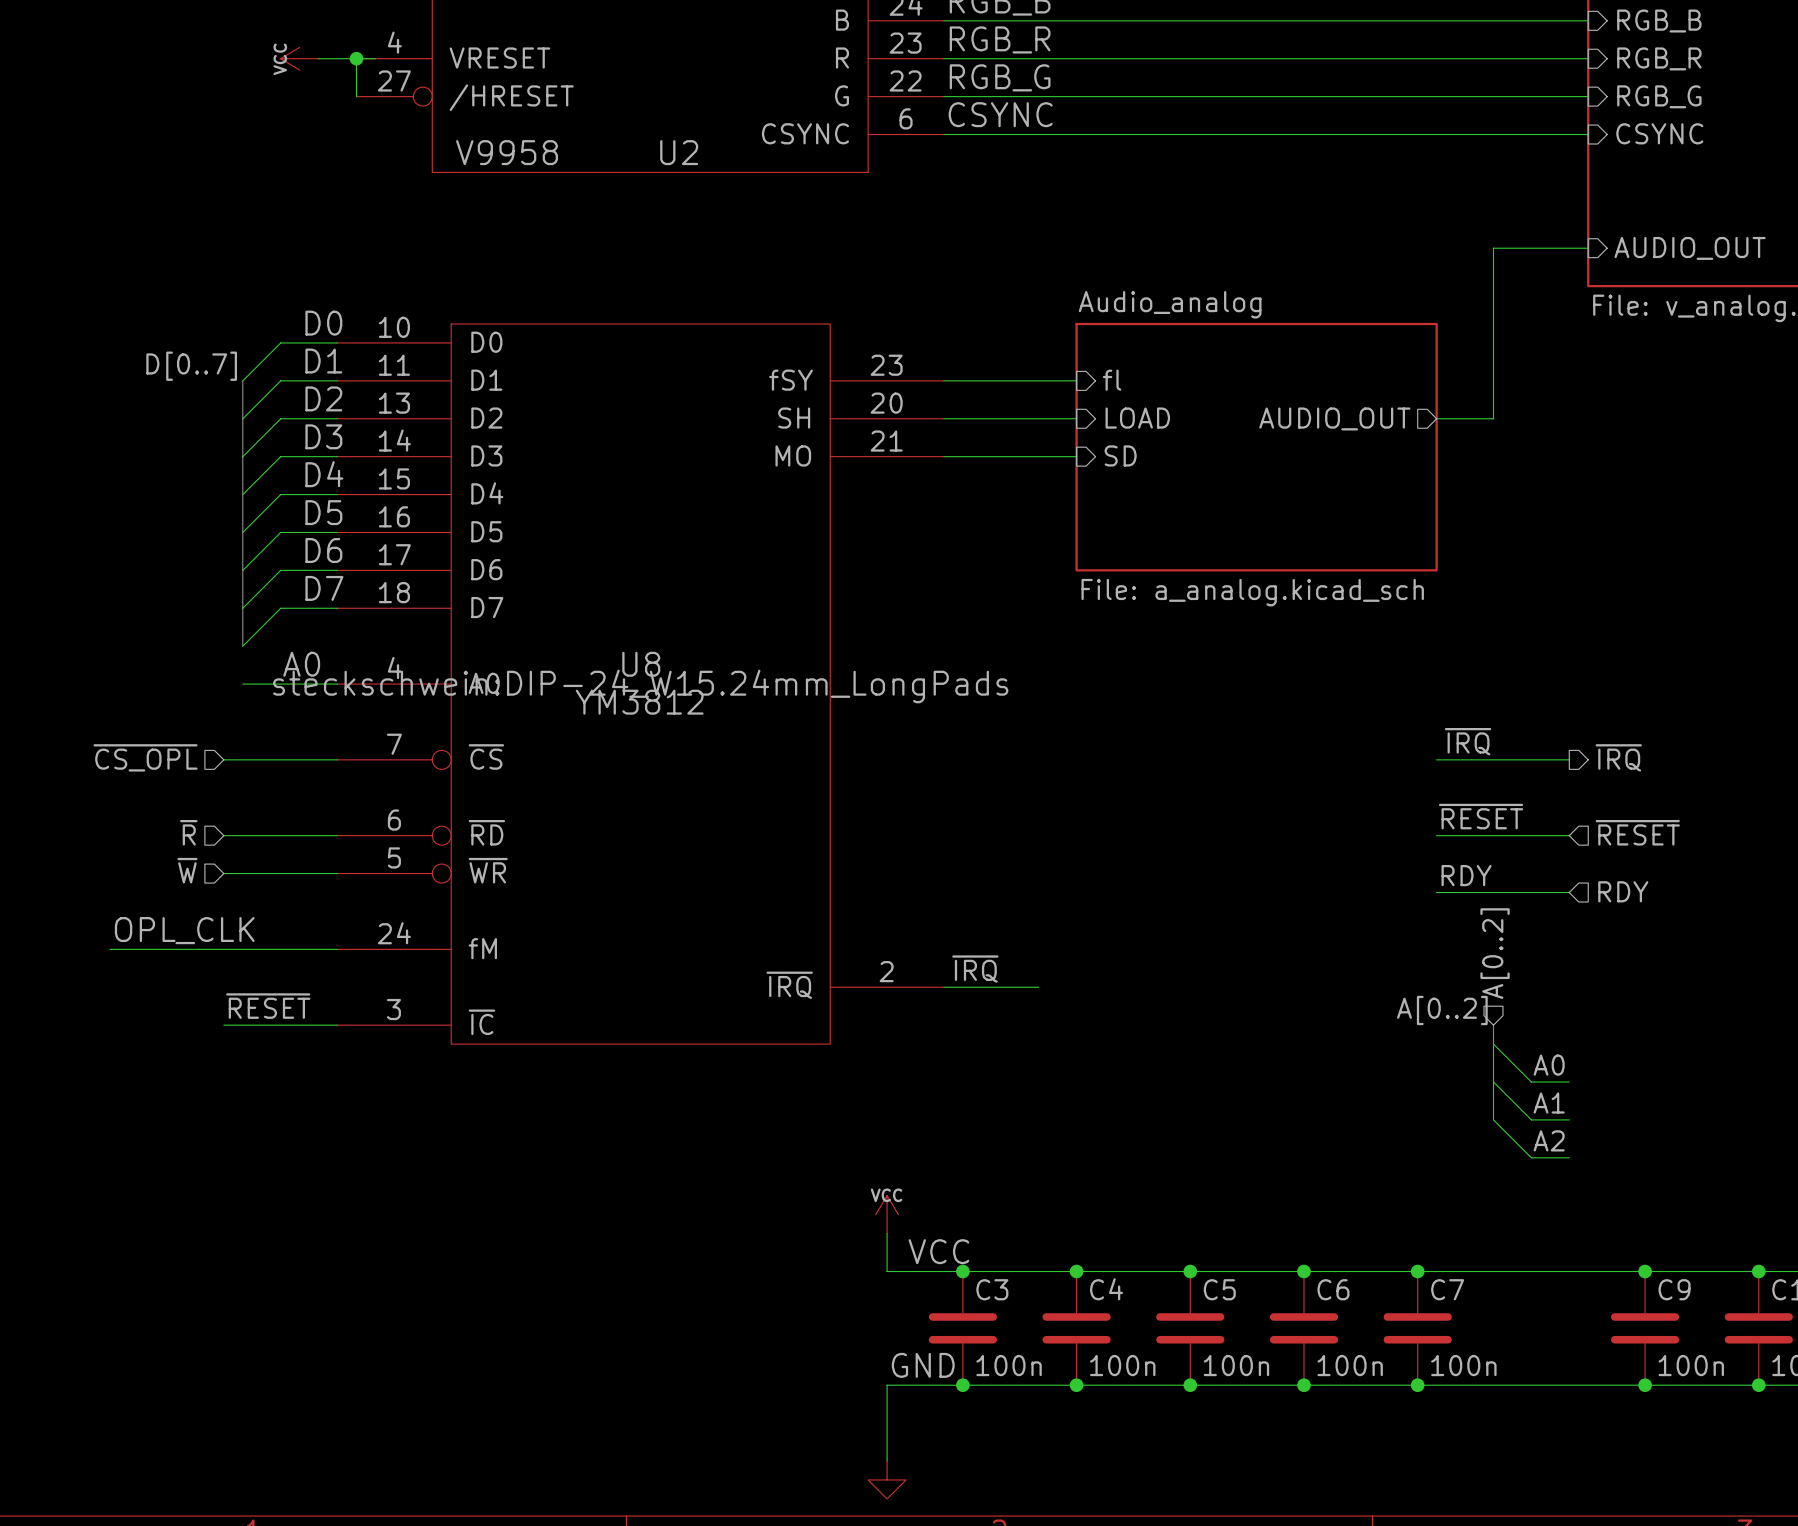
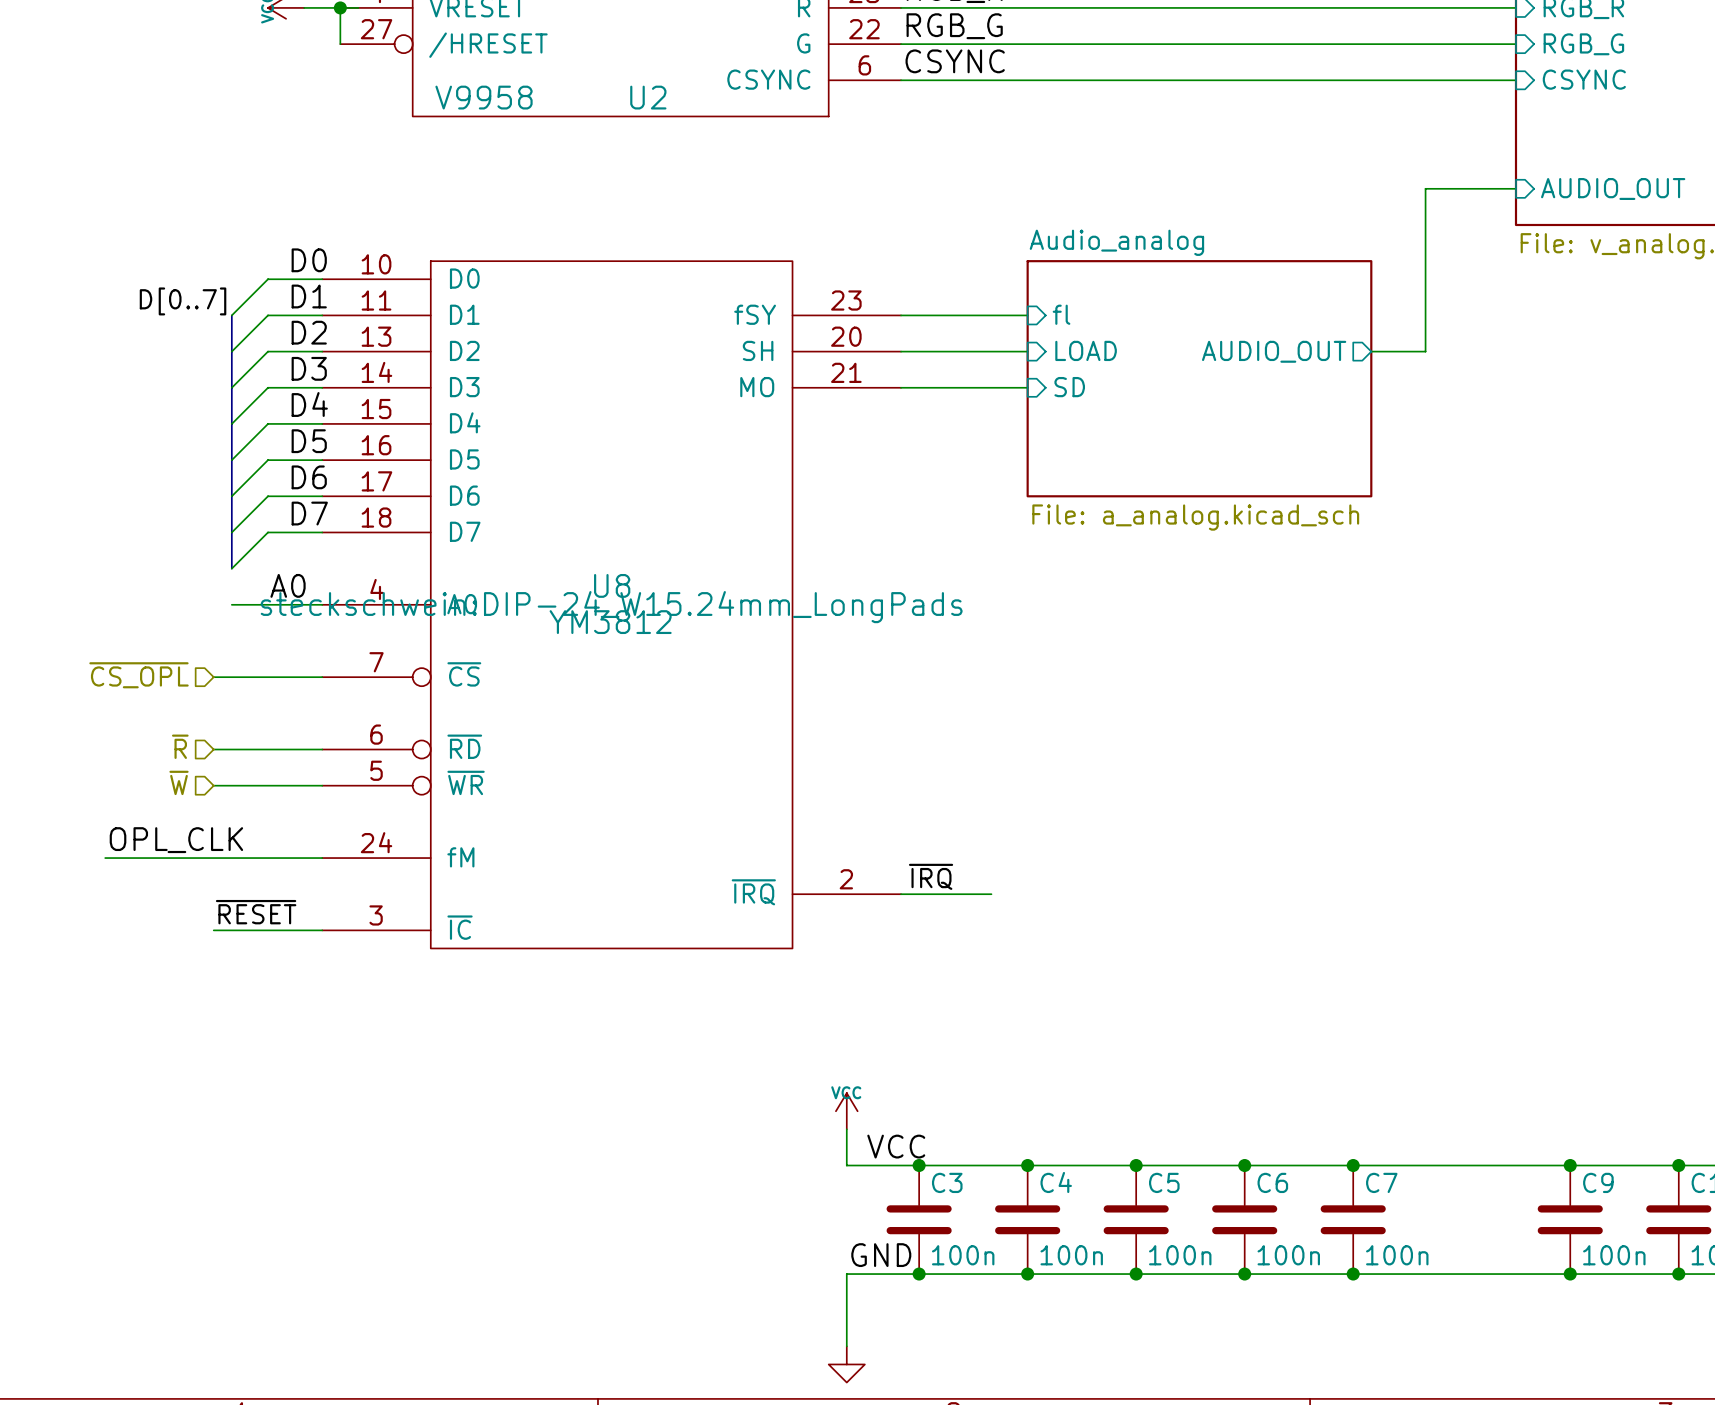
label: ~{IRQ} (1468, 741) -> none
hierarchical label: ~{IRQ} (1618, 757) -> none
wire: (1436, 759) (1569, 759) -> none
label: ~{RESET} (1481, 816) -> none
hierarchical label: ~{RESET} (1637, 832) -> none
wire: (1436, 835) (1569, 835) -> none
label: RDY (1466, 875) -> none
hierarchical label: RDY (1623, 891) -> none
wire: (1436, 892) (1569, 892) -> none
hierarchical label: A[0..2] (1495, 953) -> none
label: A[0..2] (1442, 1010) -> none
bus: (1493, 1025) (1493, 1119) -> none
wire: (1493, 1044) (1531, 1082) (1569, 1082) -> none
label: A0 (1549, 1065) -> none
wire: (1493, 1082) (1531, 1119) (1569, 1119) -> none
label: A1 (1549, 1103) -> none
wire: (1493, 1119) (1531, 1157) (1569, 1157) -> none
label: A2 (1549, 1140) -> none

